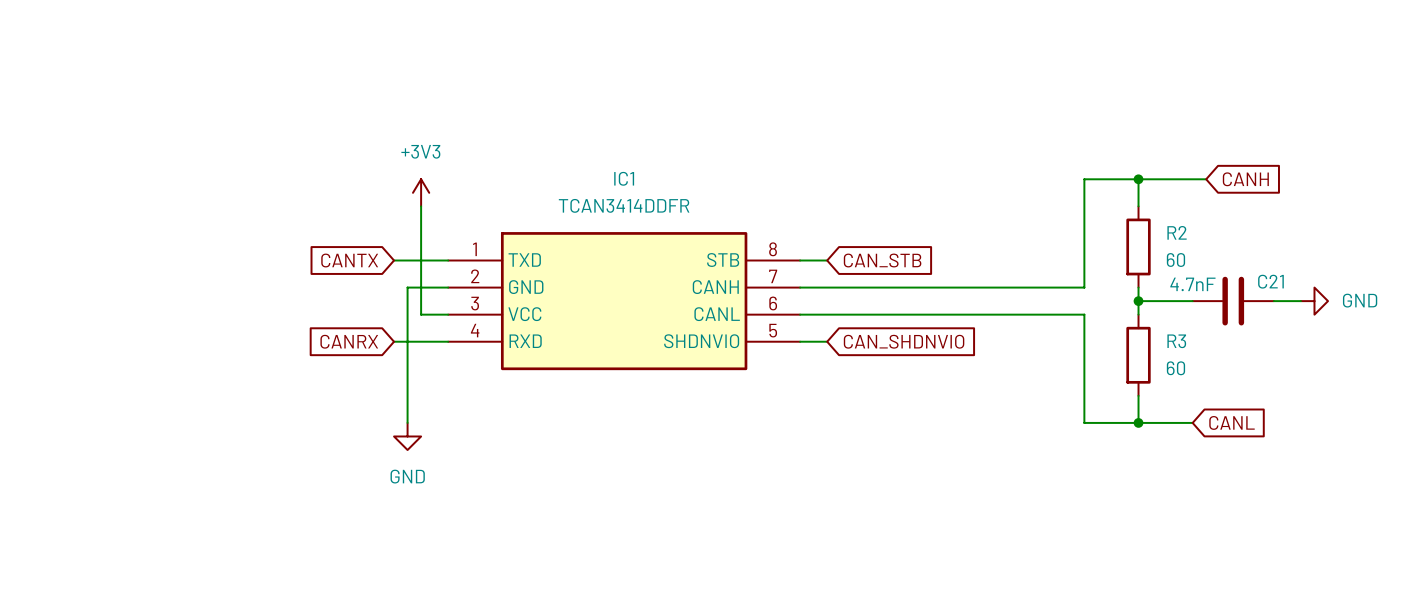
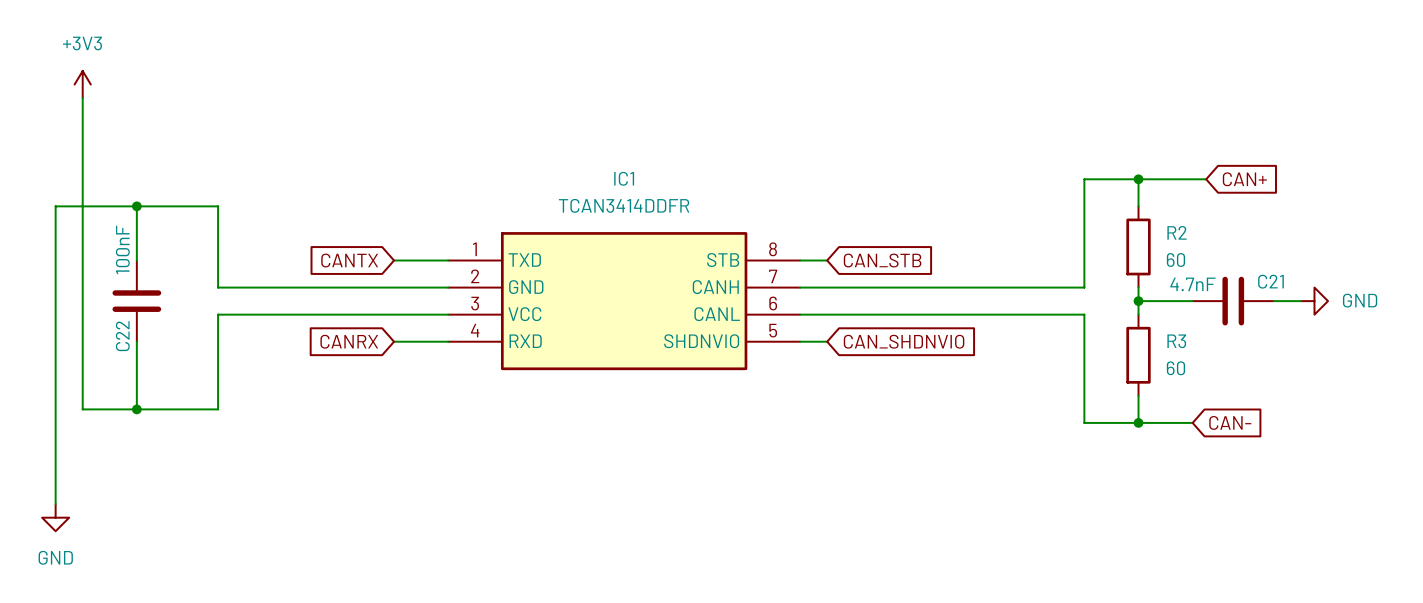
power symbol: none -> +3V3 (82, 84)
global label: CANH (1245, 179) -> CAN+ (1244, 179)
power symbol: +3V3 (421, 192) -> none
wire: none -> (136, 206) (136, 260)
junction: none -> (136, 206)
wire: (421, 206) (421, 314) -> (82, 98) (82, 409) (218, 409) (218, 314) (421, 314)
wire: (407, 287) (407, 422) -> (407, 287) (218, 287) (218, 206) (55, 206) (55, 504)
C22: none -> 100nF (136, 301)
wire: none -> (136, 341) (136, 409)
junction: none -> (136, 409)
global label: CANL (1232, 422) -> CAN- (1230, 422)
power symbol: GND (407, 436) -> none
power symbol: none -> GND (55, 517)

